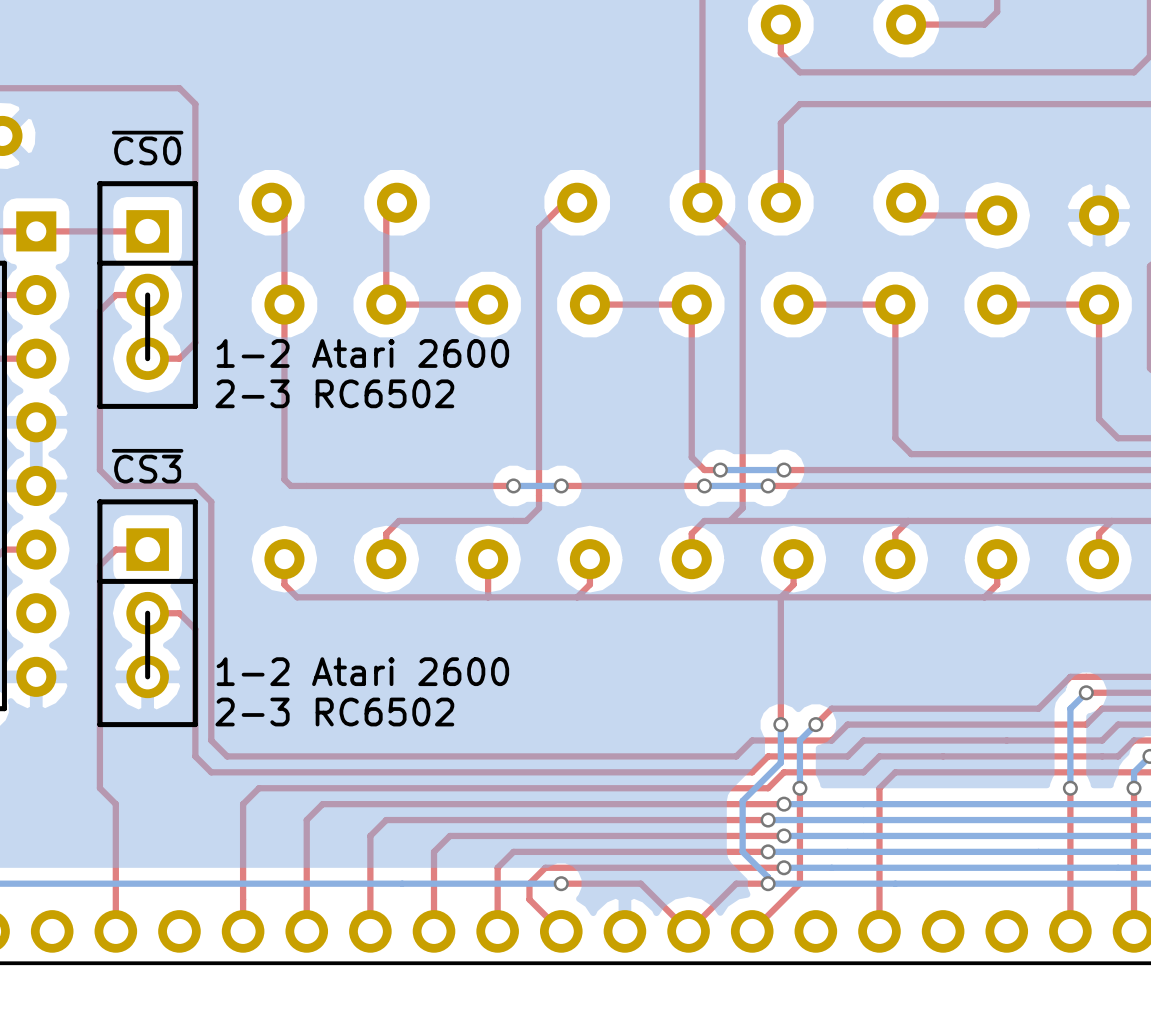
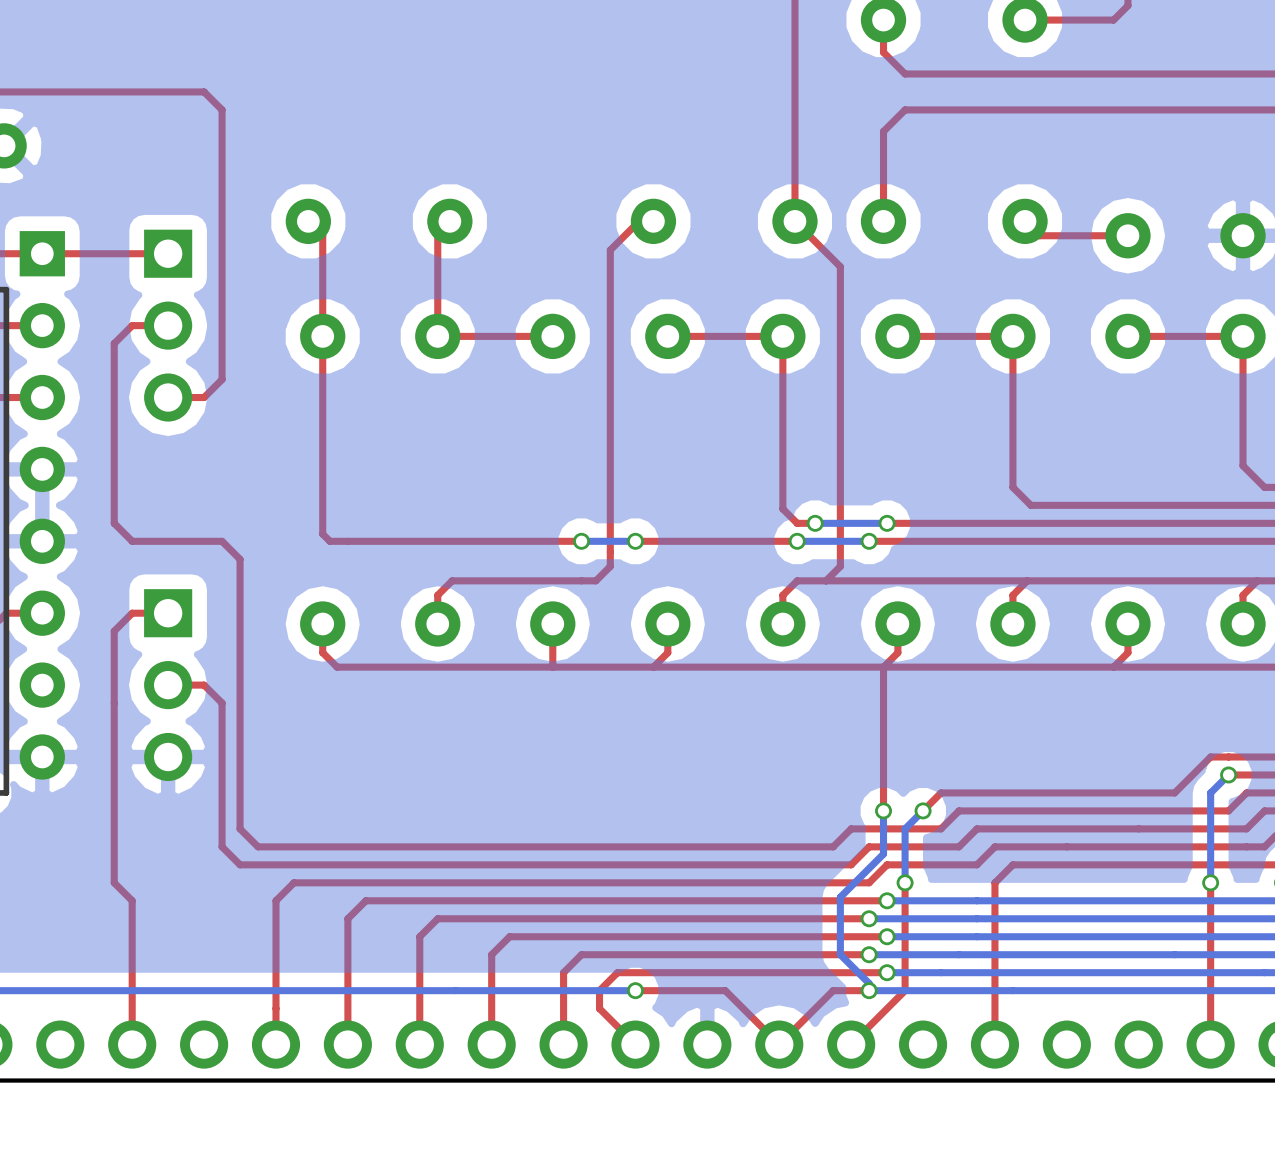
text: ~{CS0} (147, 148) -> none
line: (195, 183) (195, 406) (99, 406) (99, 183) (195, 183) -> none
line: (195, 263) (99, 263) -> none
line: (147, 295) (147, 358) -> none
text: 1-2 Atari 2600 (362, 353) -> none
text: 2-3 RC6502 (334, 393) -> none
text: ~{CS3} (147, 466) -> none
line: (195, 501) (195, 724) (99, 724) (99, 501) (195, 501) -> none
line: (195, 581) (99, 581) -> none
line: (147, 613) (147, 676) -> none
text: 1-2 Atari 2600 (362, 671) -> none
text: 2-3 RC6502 (334, 712) -> none

